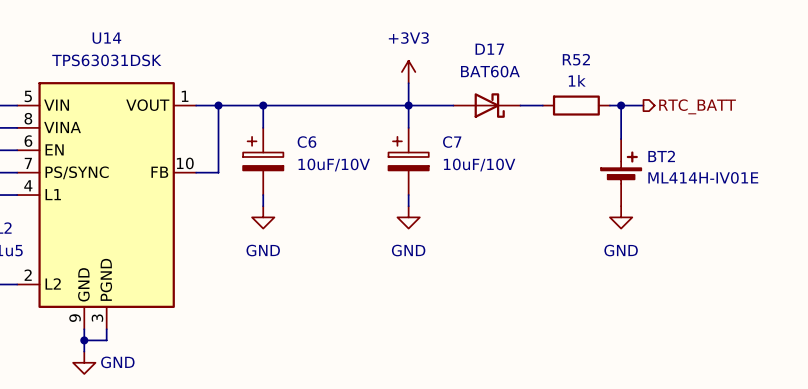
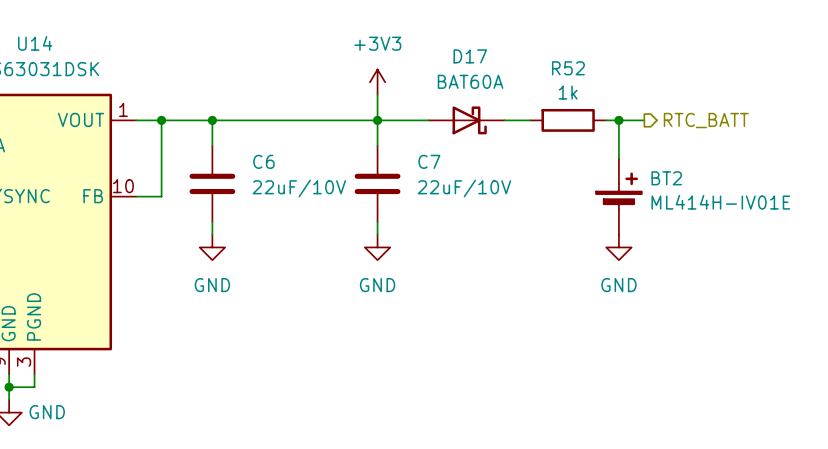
C6 symbol: [243, 127, 284, 196] -> [189, 145, 236, 223]
C7 symbol: [388, 127, 429, 196] -> [354, 145, 401, 223]
C6 value: 10uF/10V (334, 165) -> 22uF/10V (299, 188)
C7 value: 10uF/10V (479, 165) -> 22uF/10V (464, 188)

